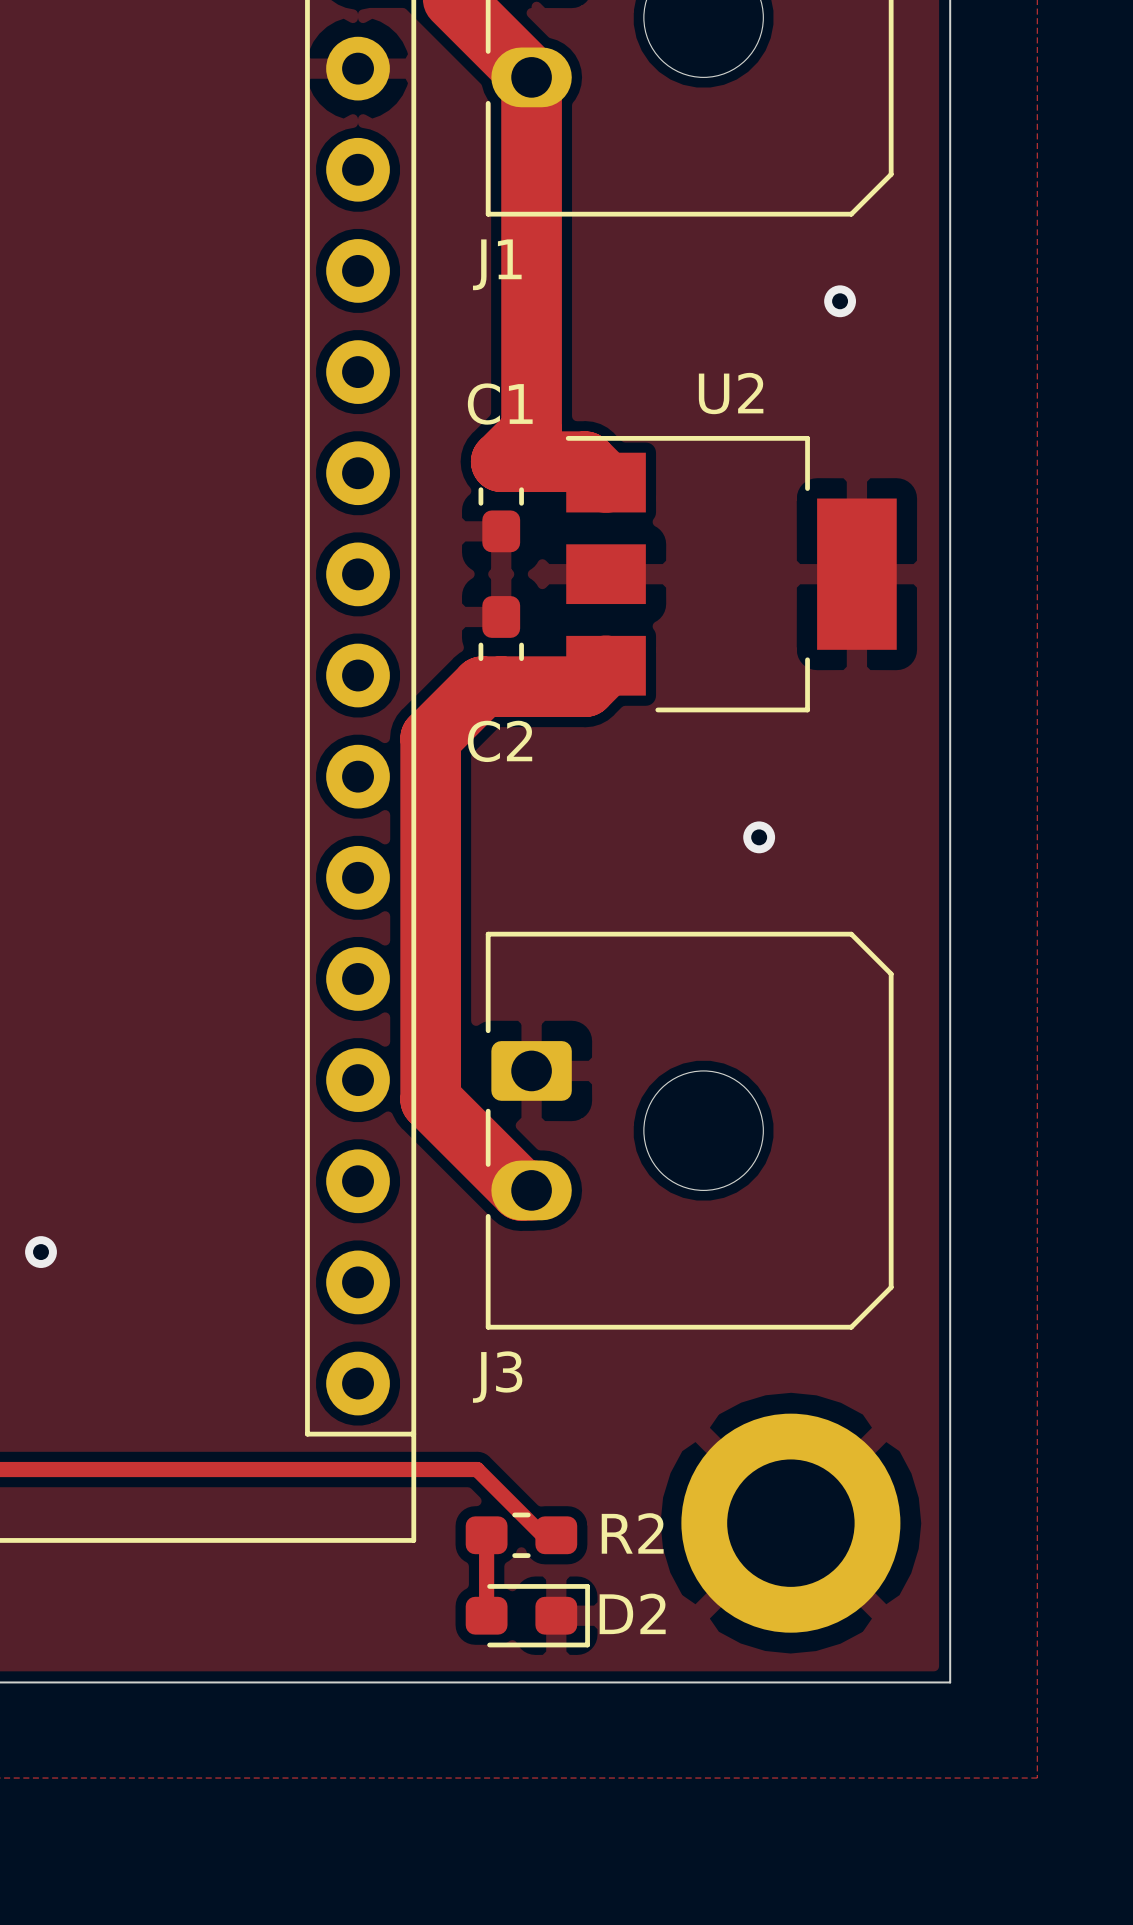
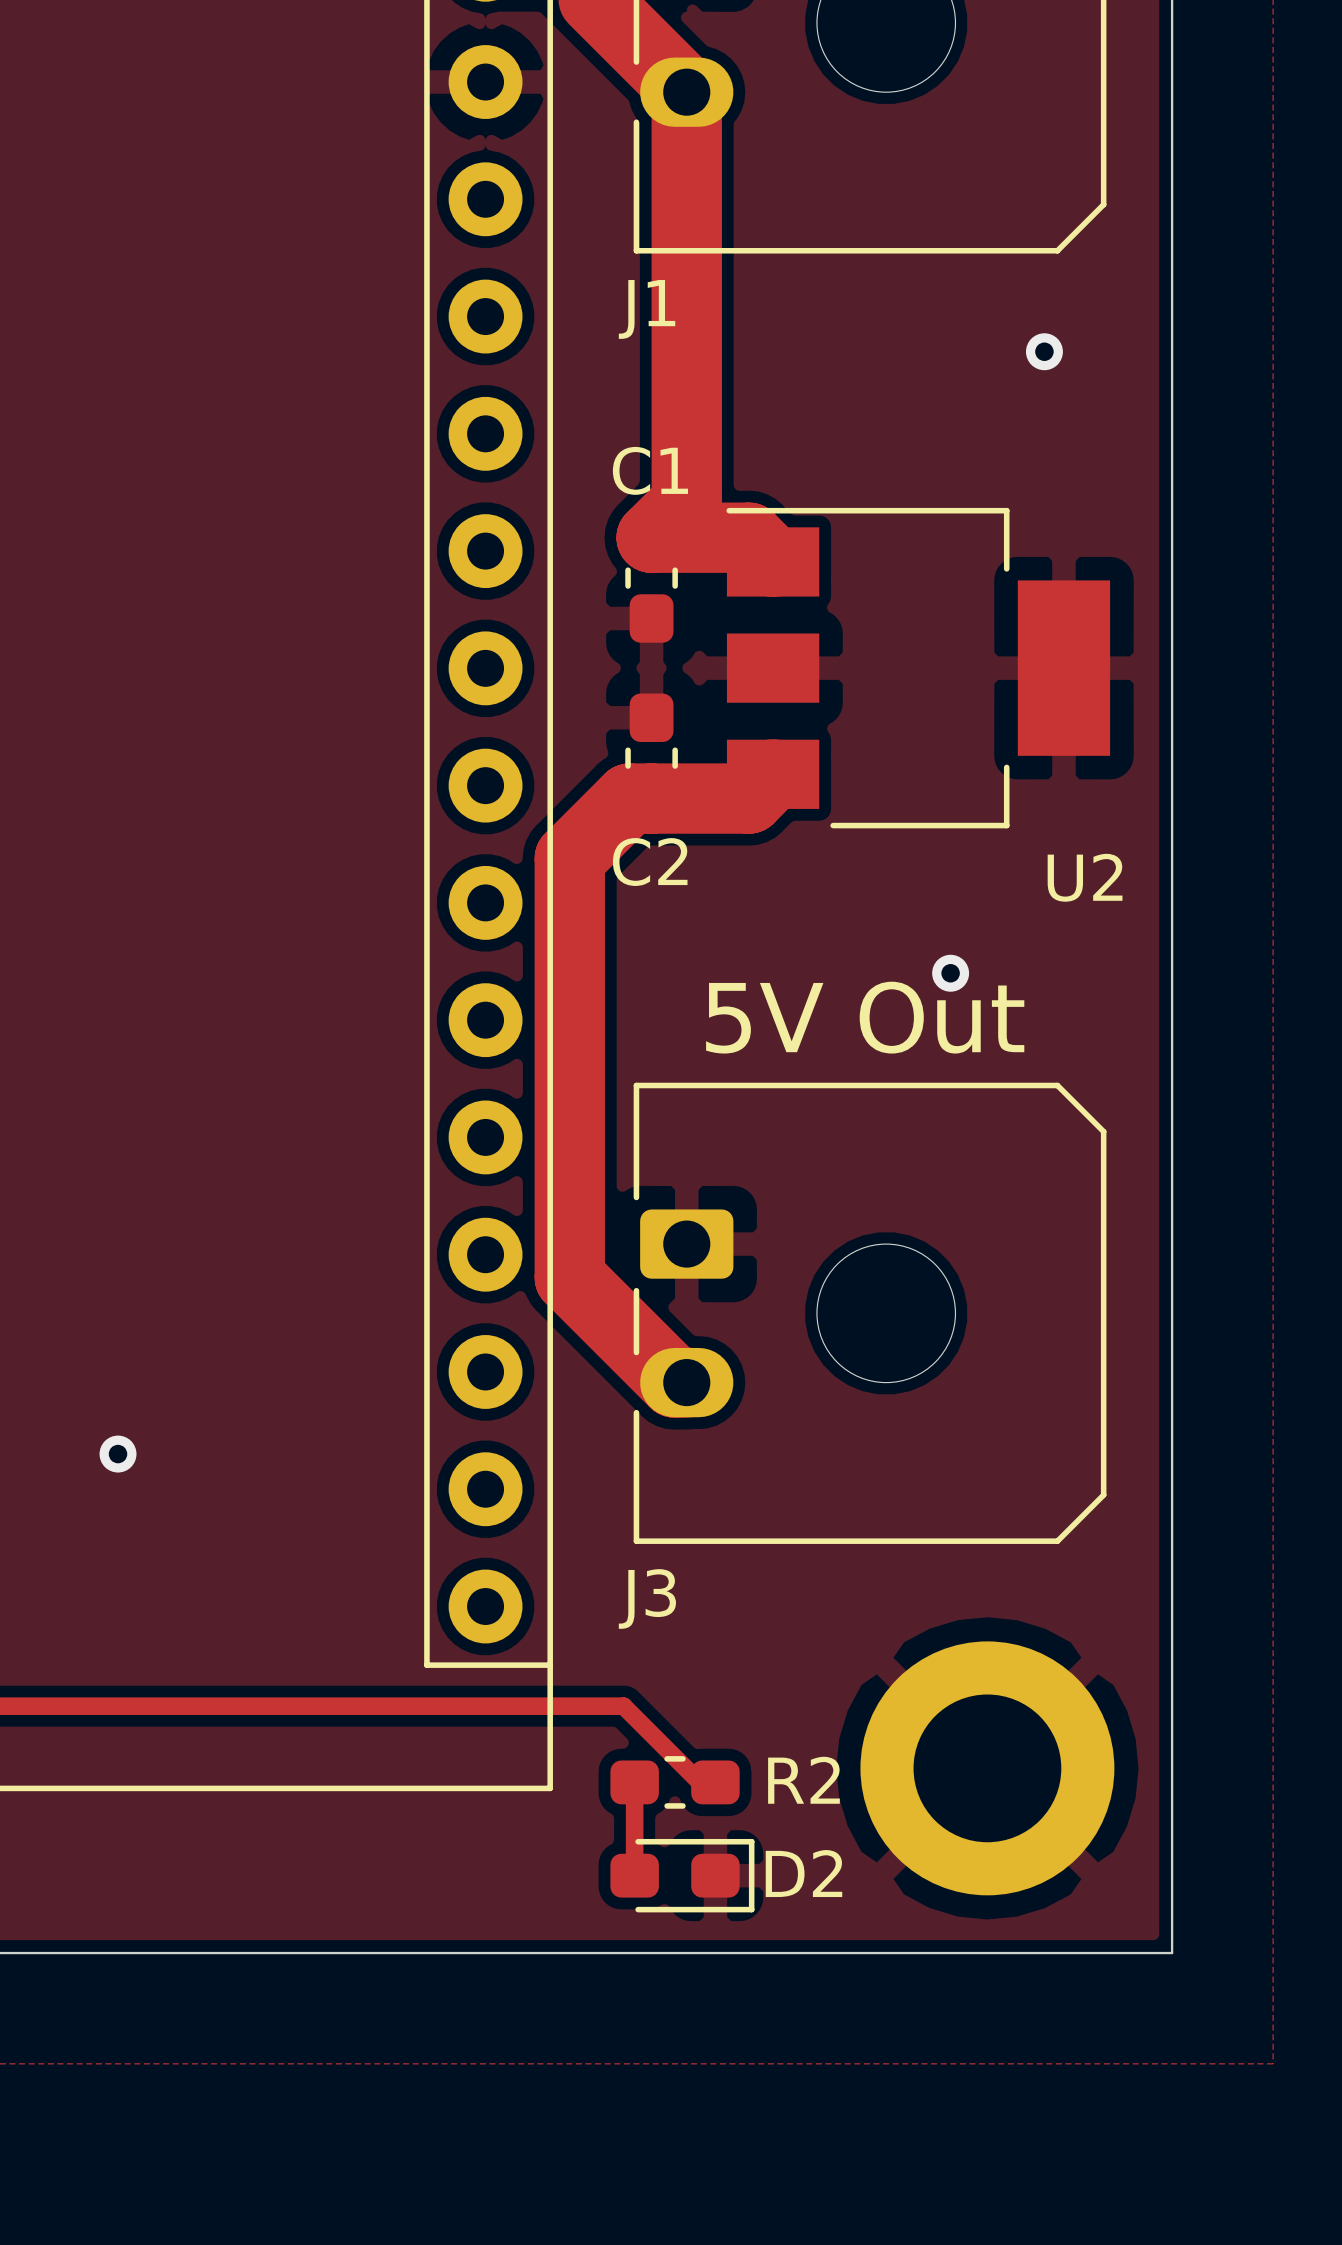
U2 name position: U2 (731, 393) -> U2 (1085, 877)
text: none -> 5V Out (865, 1017)

